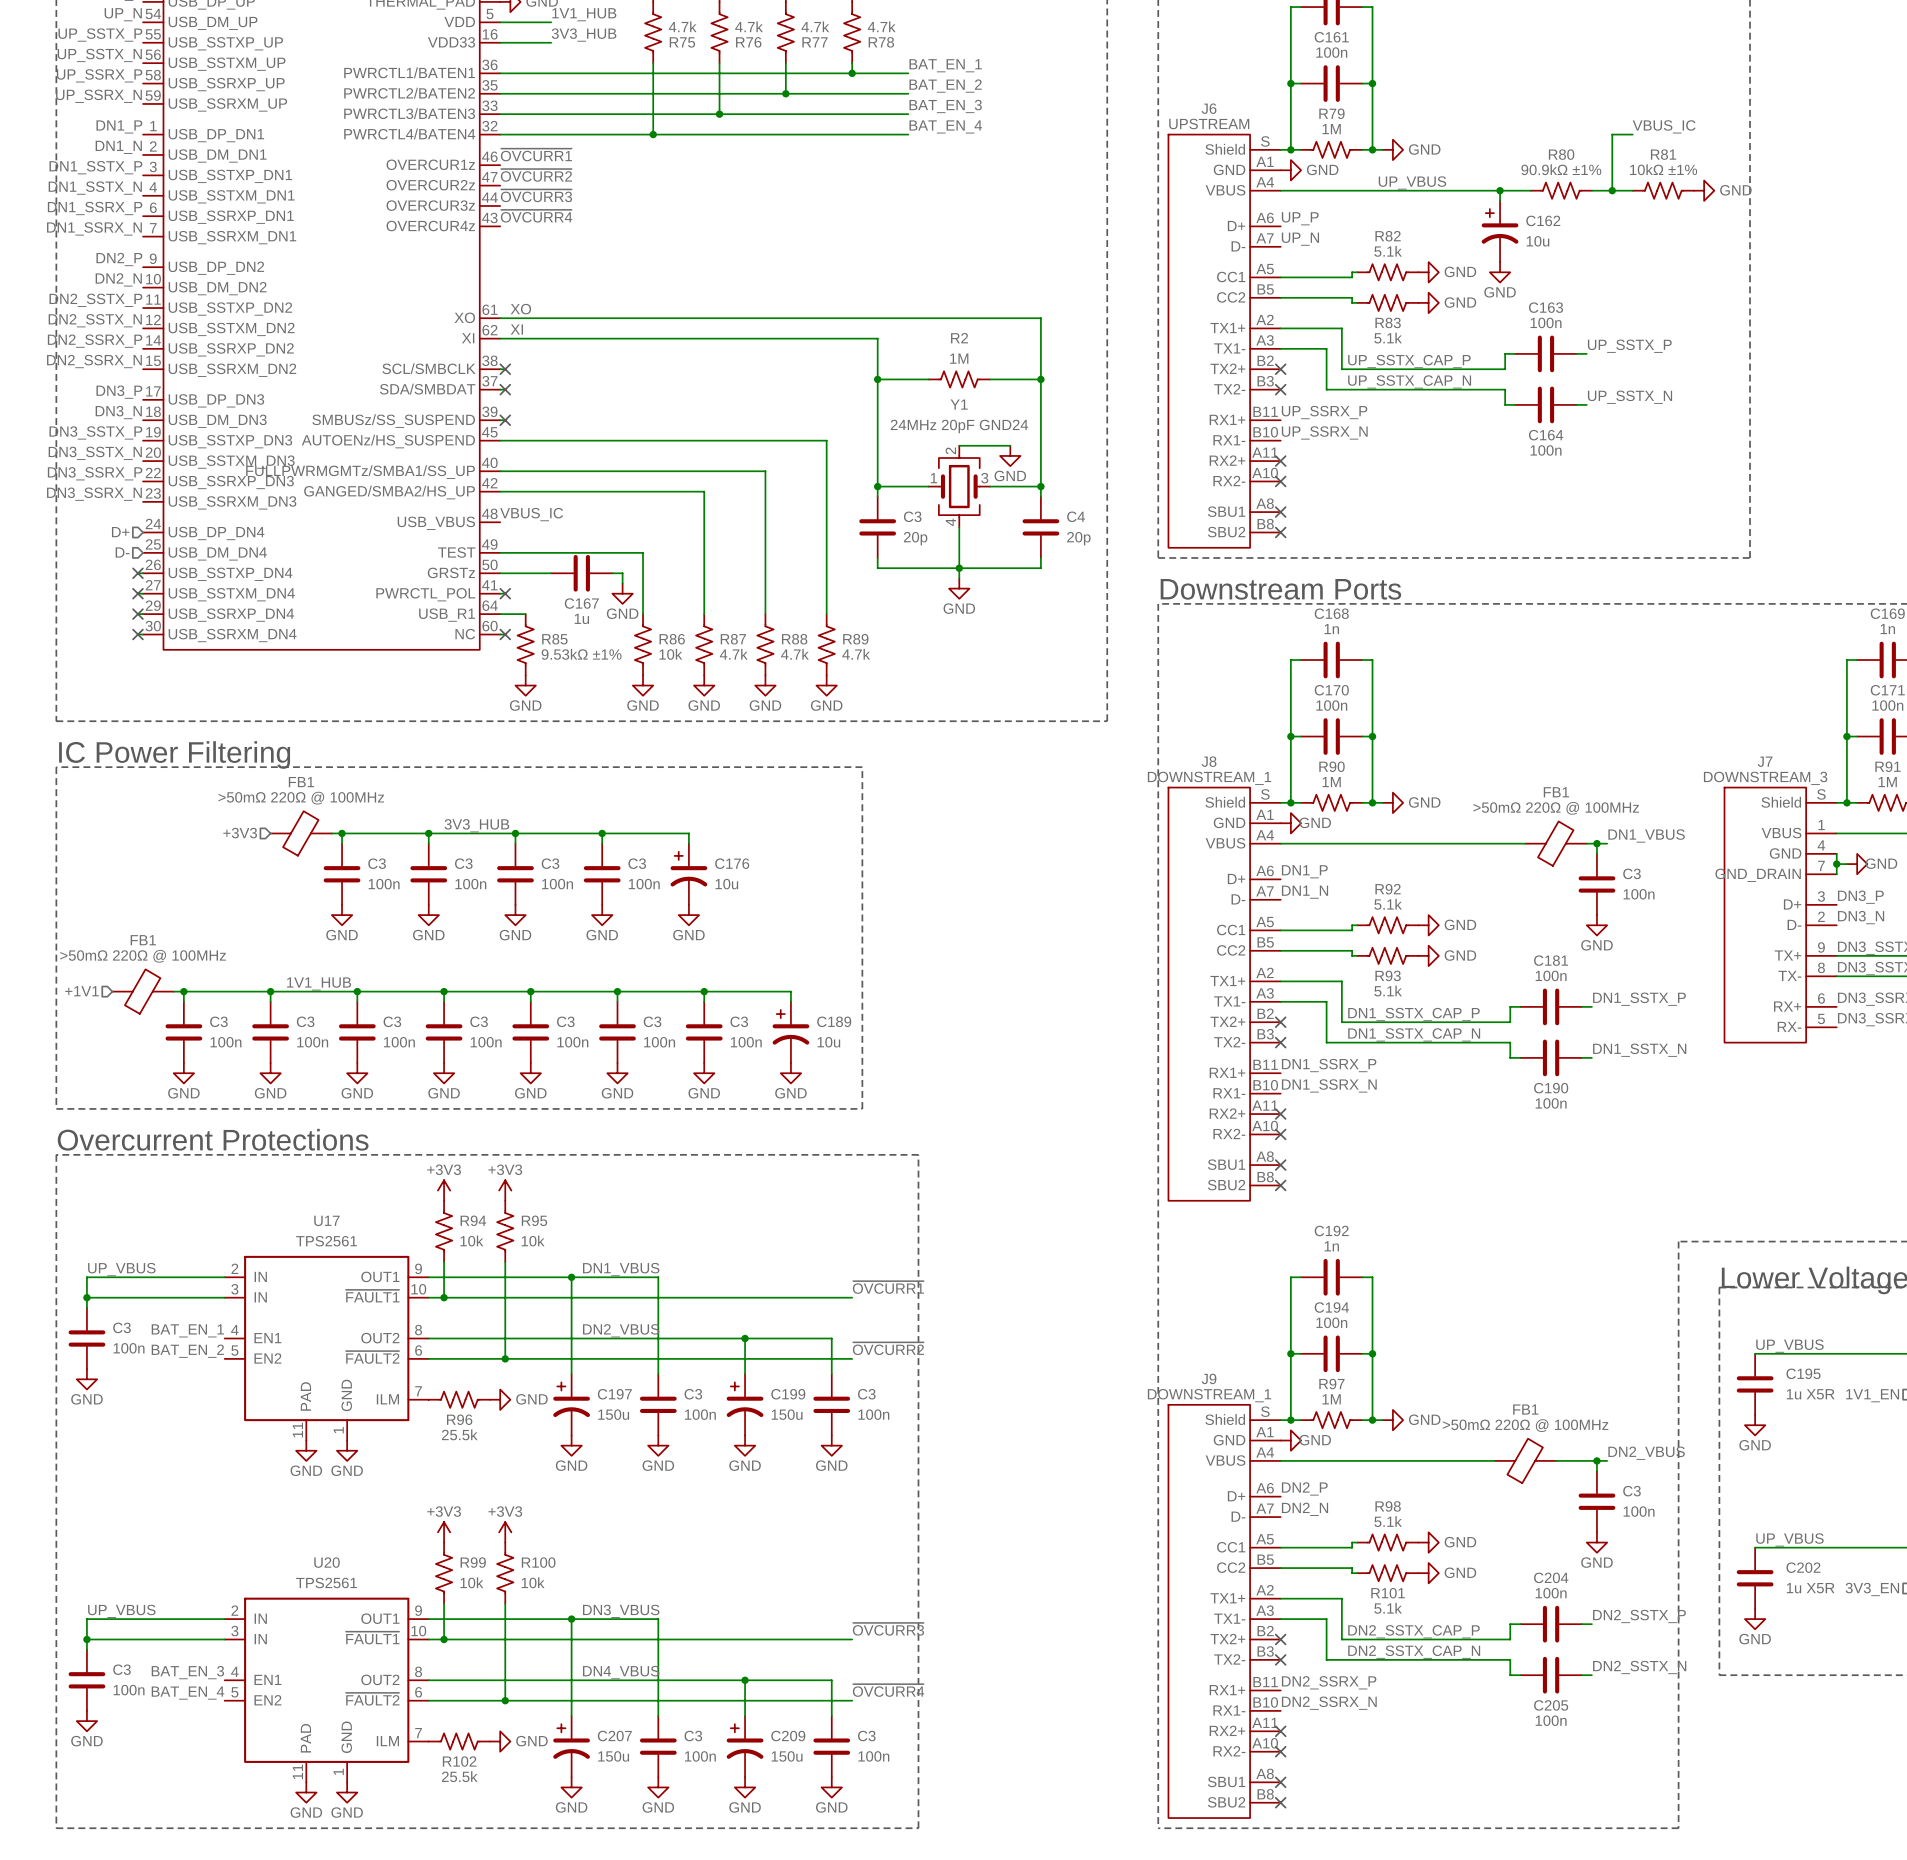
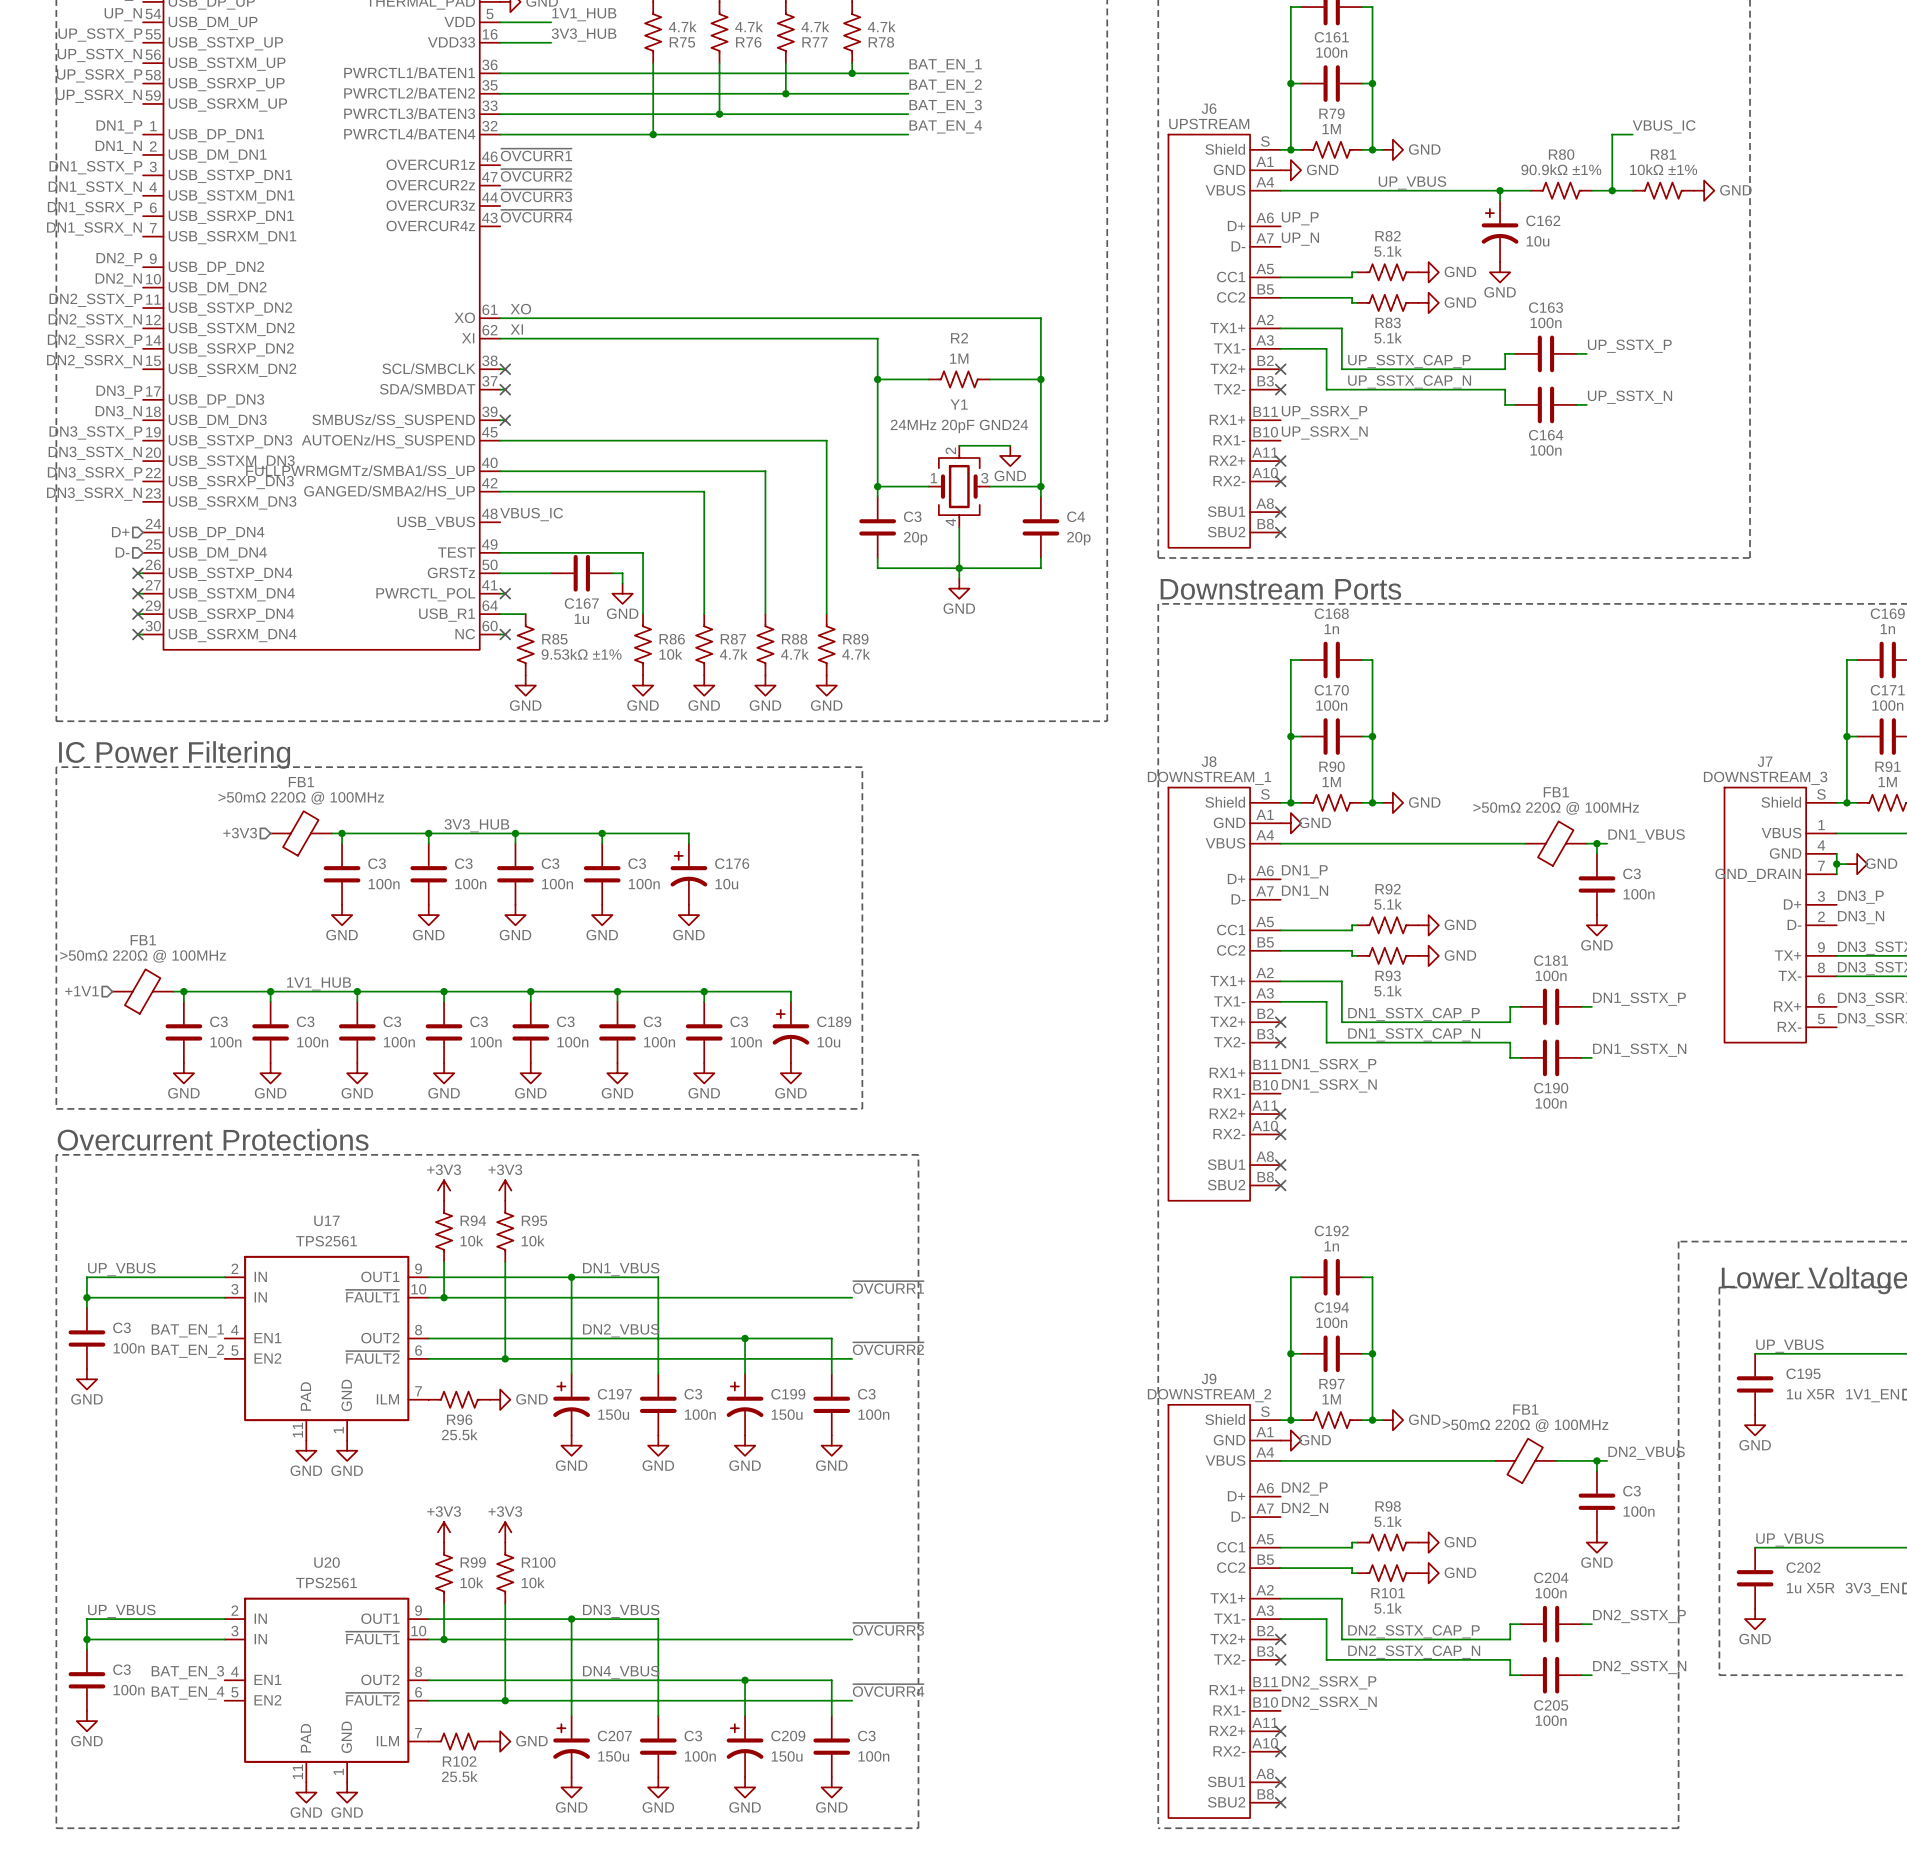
J9 value: DOWNSTREAM_1 (1209, 1395) -> DOWNSTREAM_2 (1209, 1395)

